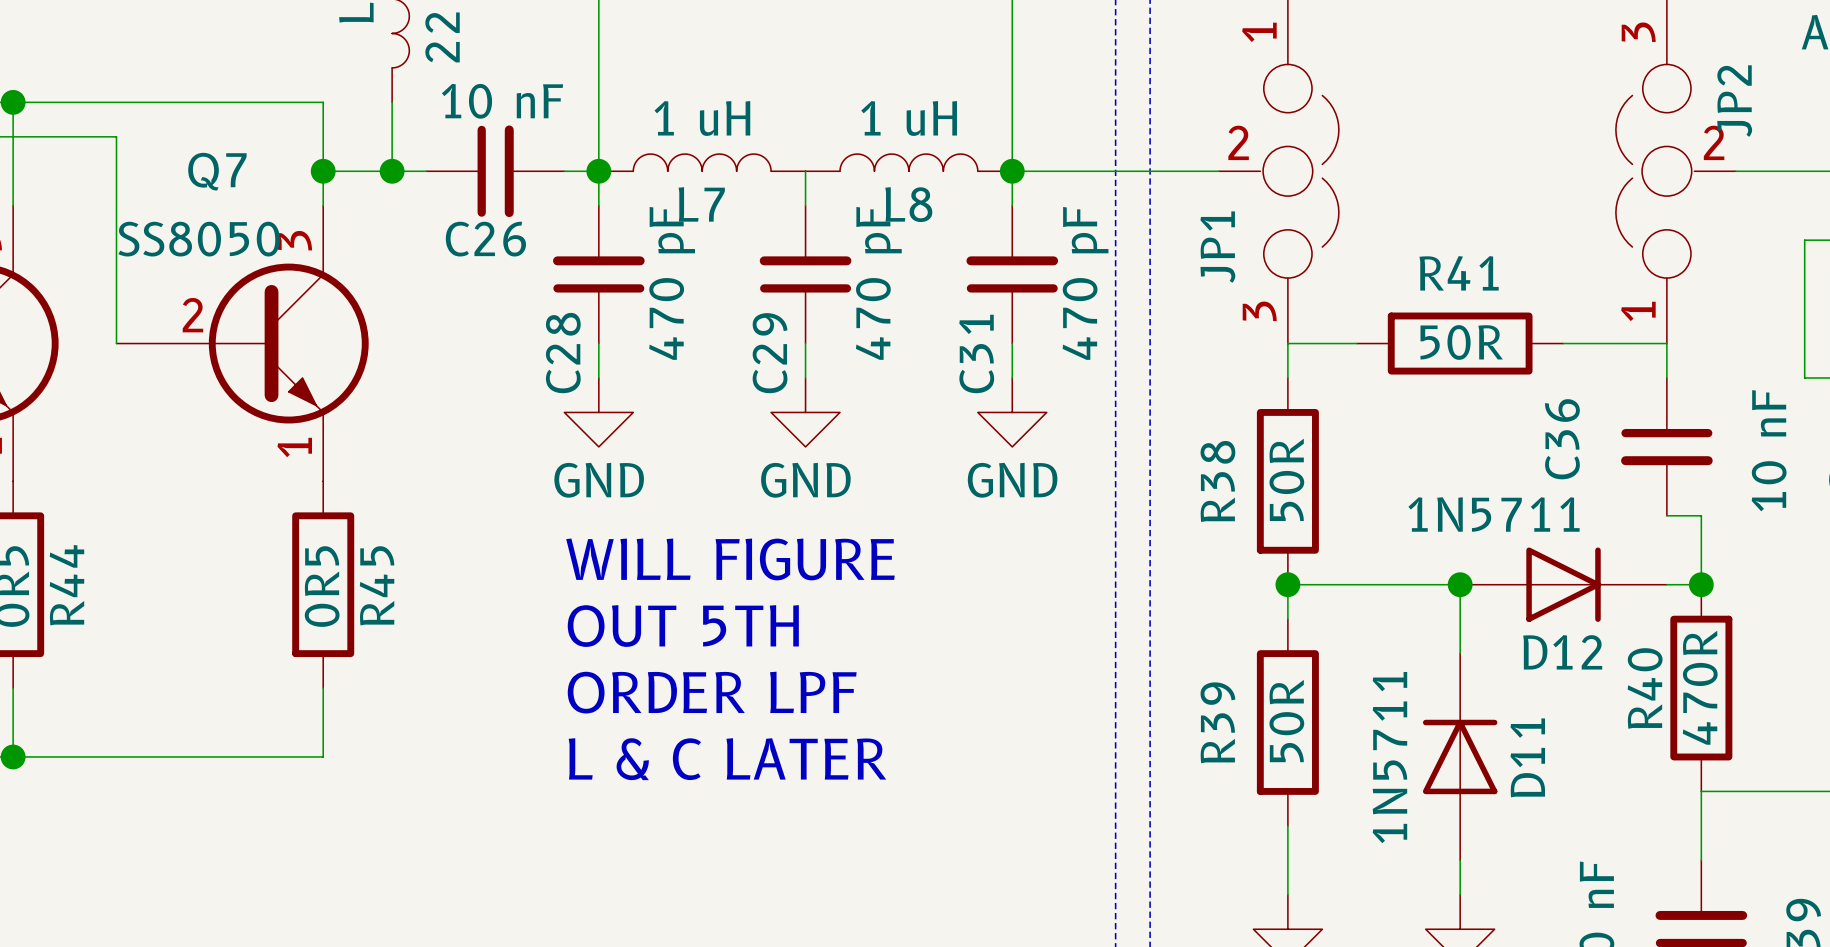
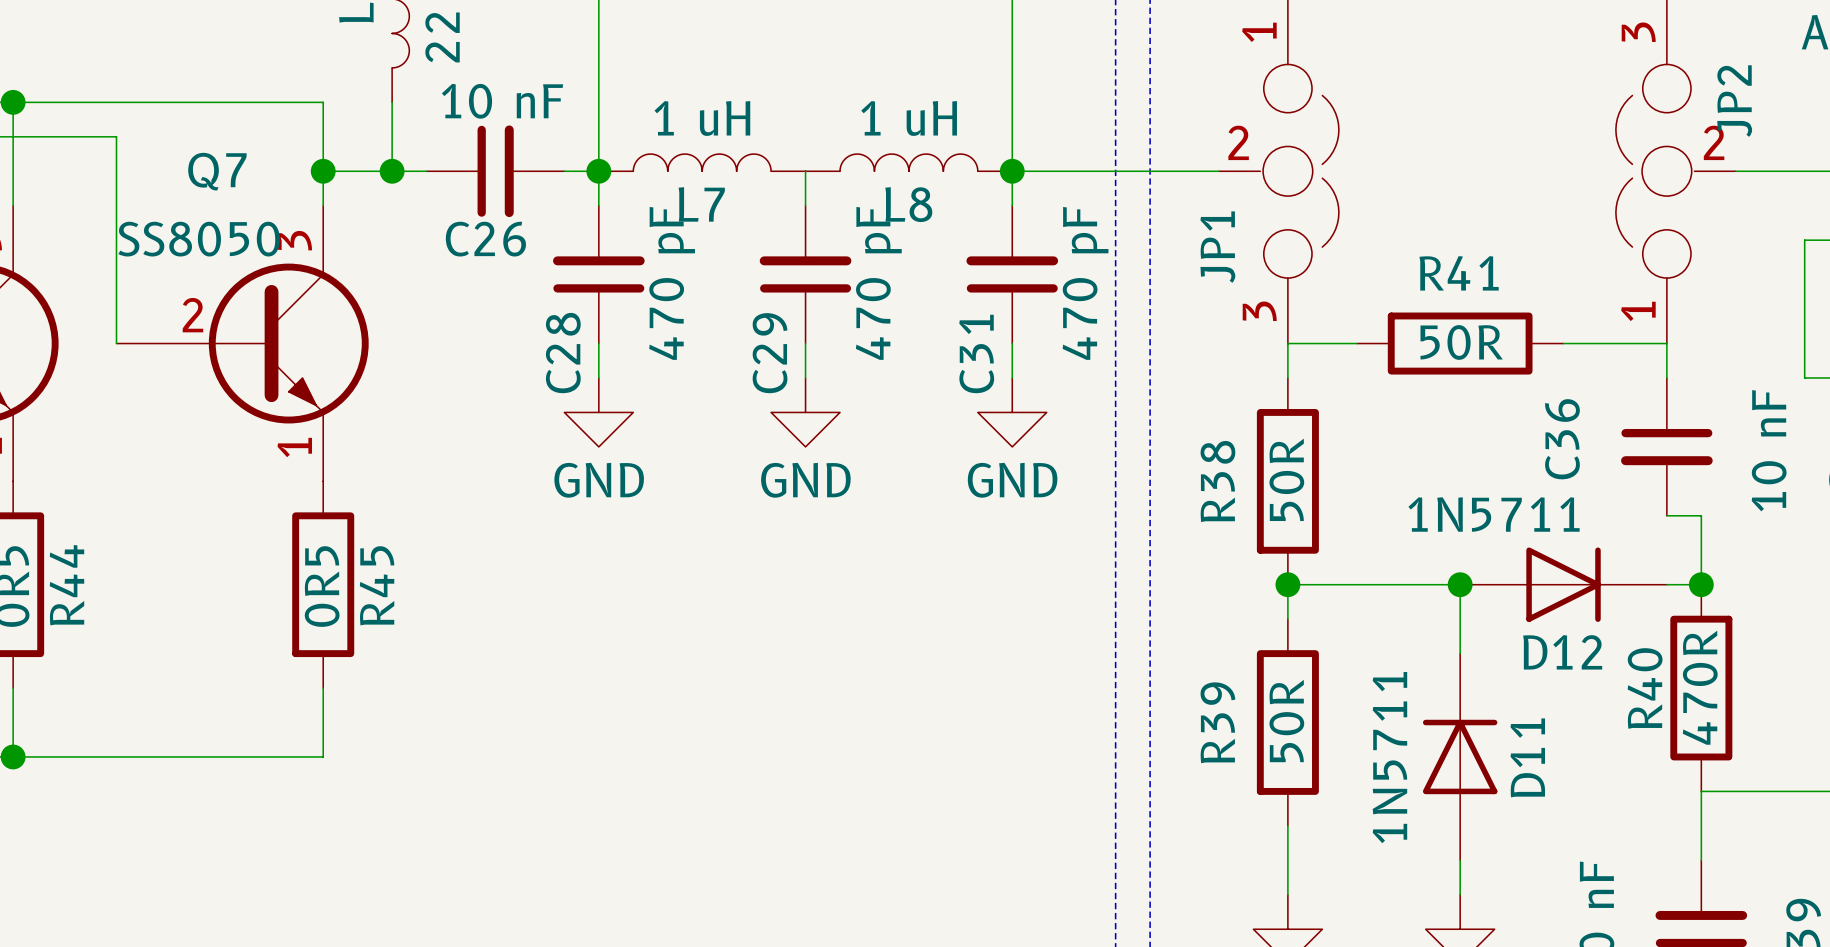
text: WILL FIGURE (730, 559) -> none
text: OUT 5TH (683, 626) -> none
text: ORDER LPF (712, 692) -> none
text: L & C LATER (727, 759) -> none

